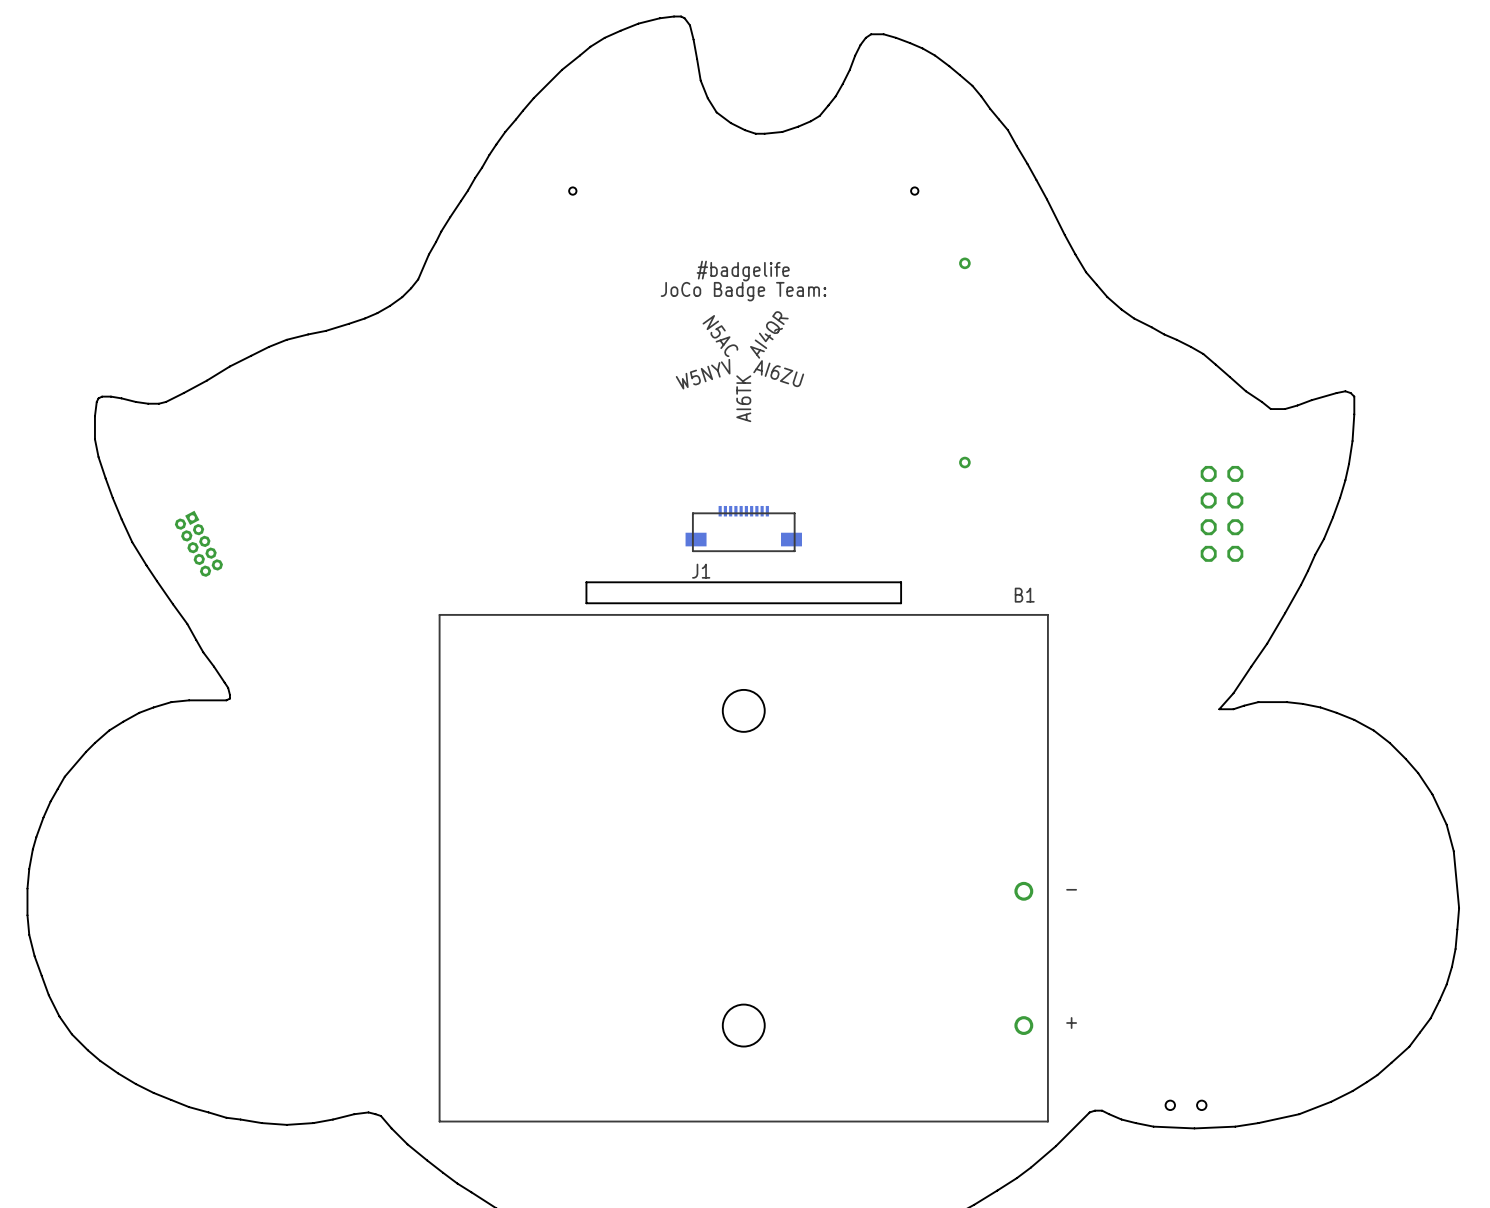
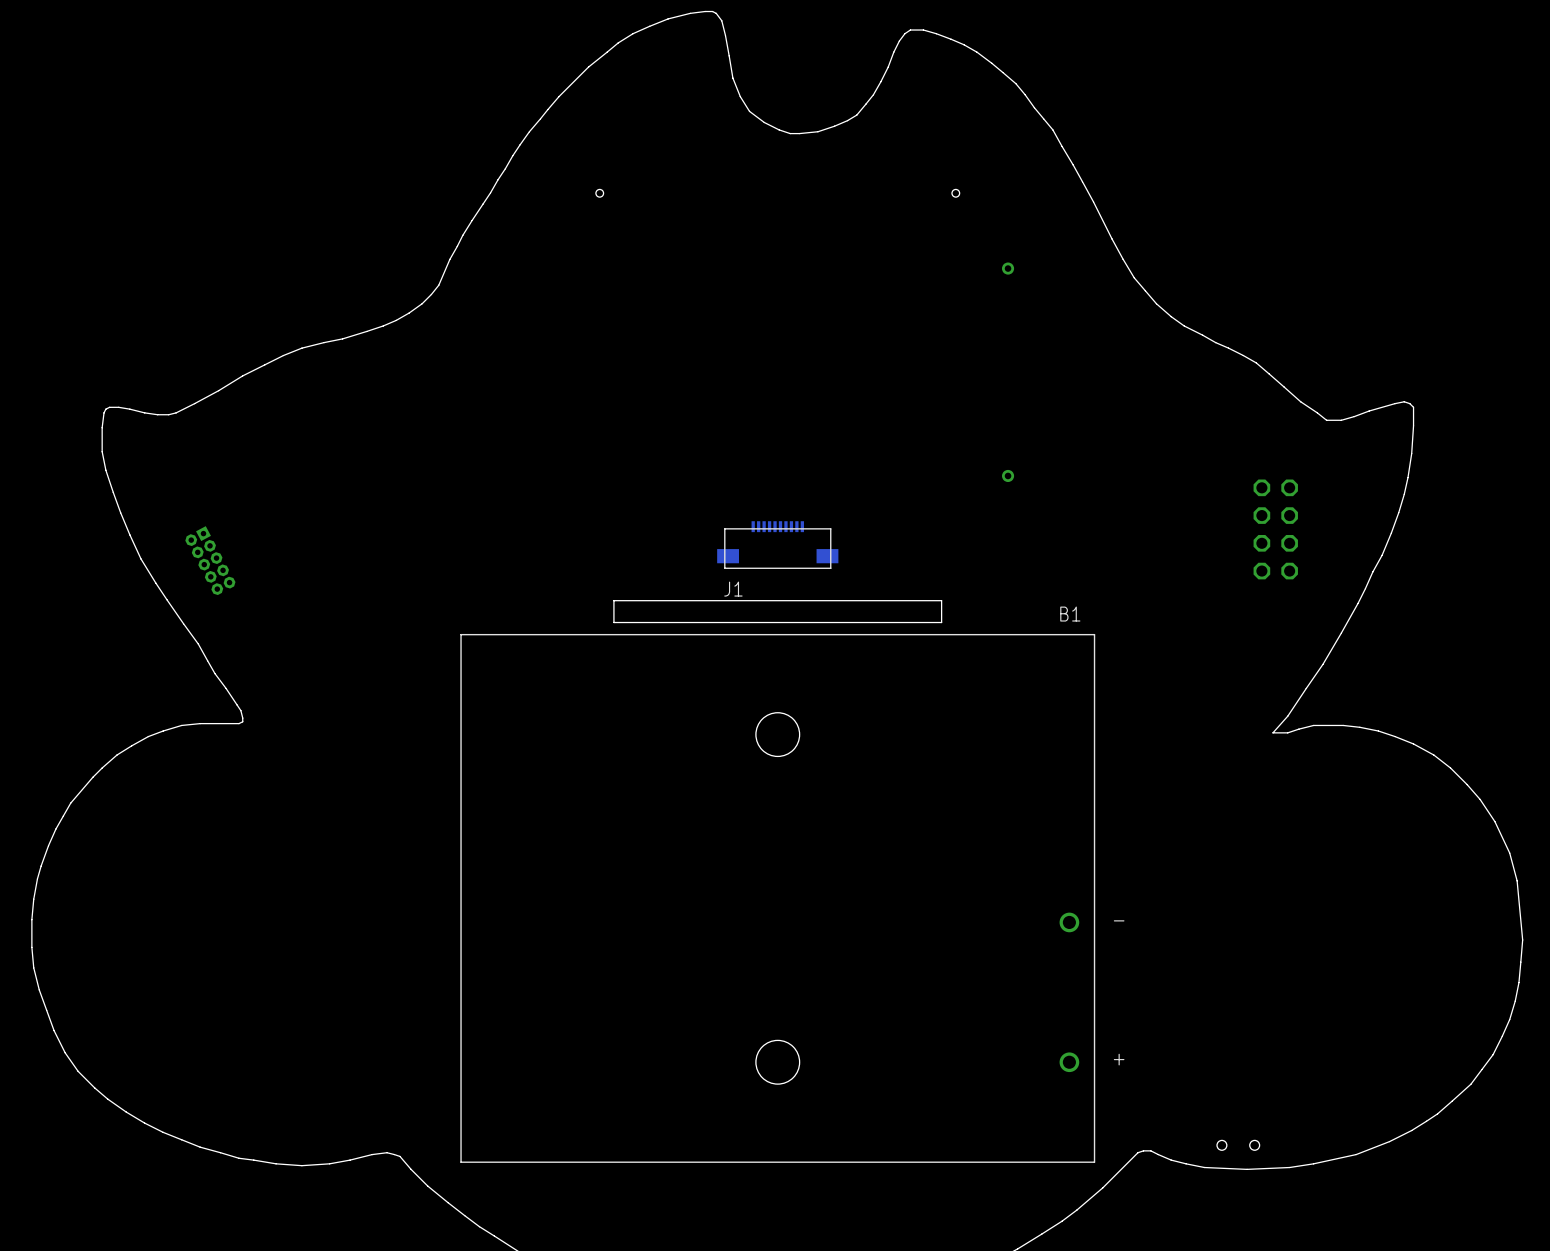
text: #badgelife (743, 271) -> none
text: JoCo Badge Team: (743, 291) -> none
text: AI4QR (769, 334) -> none
text: N5AC (720, 336) -> none
text: AI6ZU (778, 373) -> none
text: W5NYV (703, 374) -> none
text: AI6TK (743, 398) -> none

